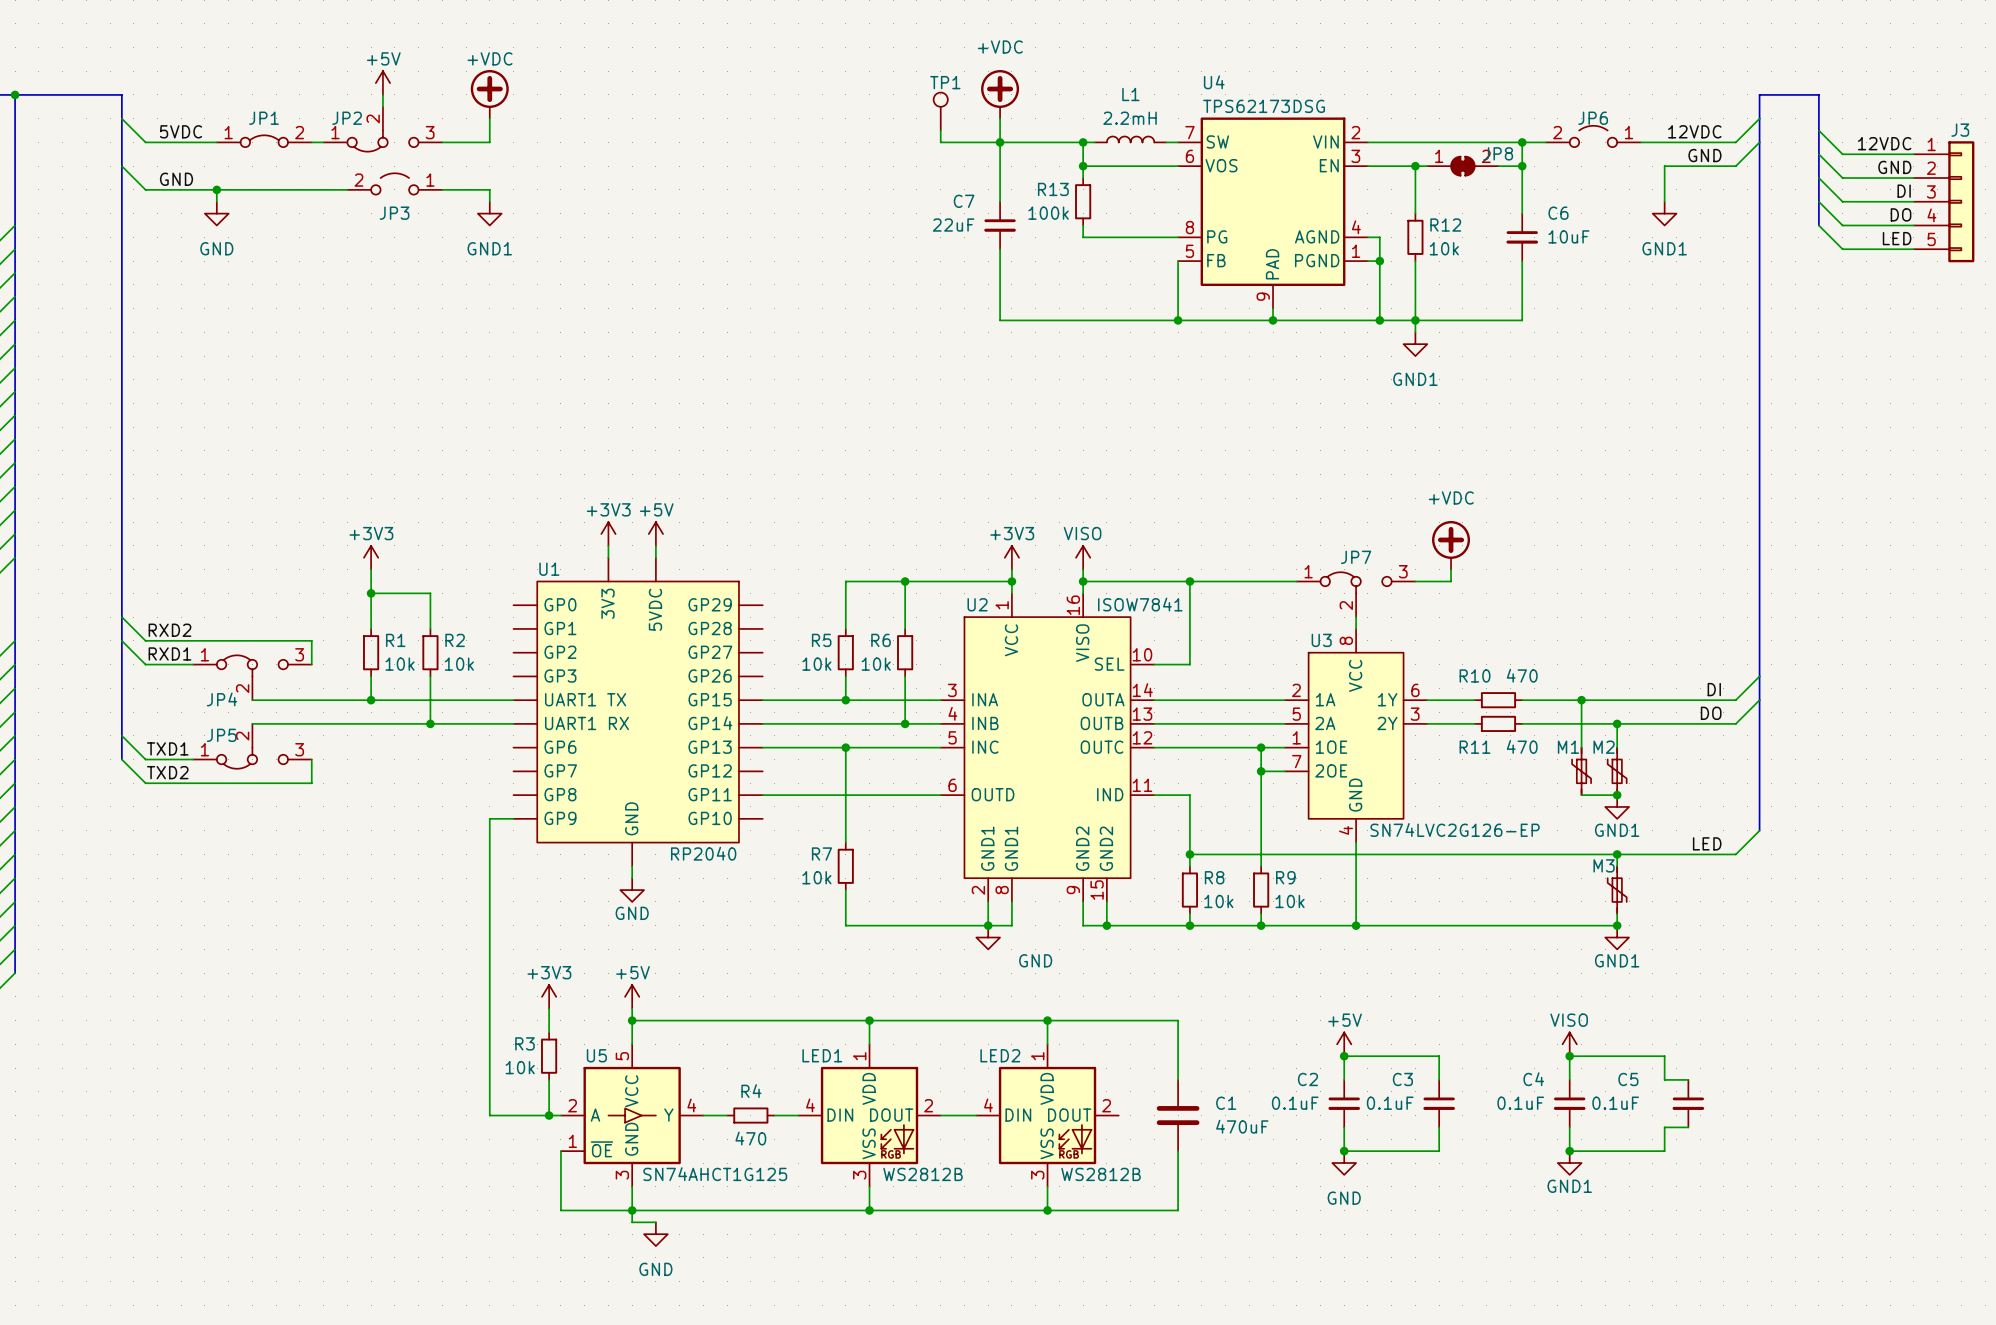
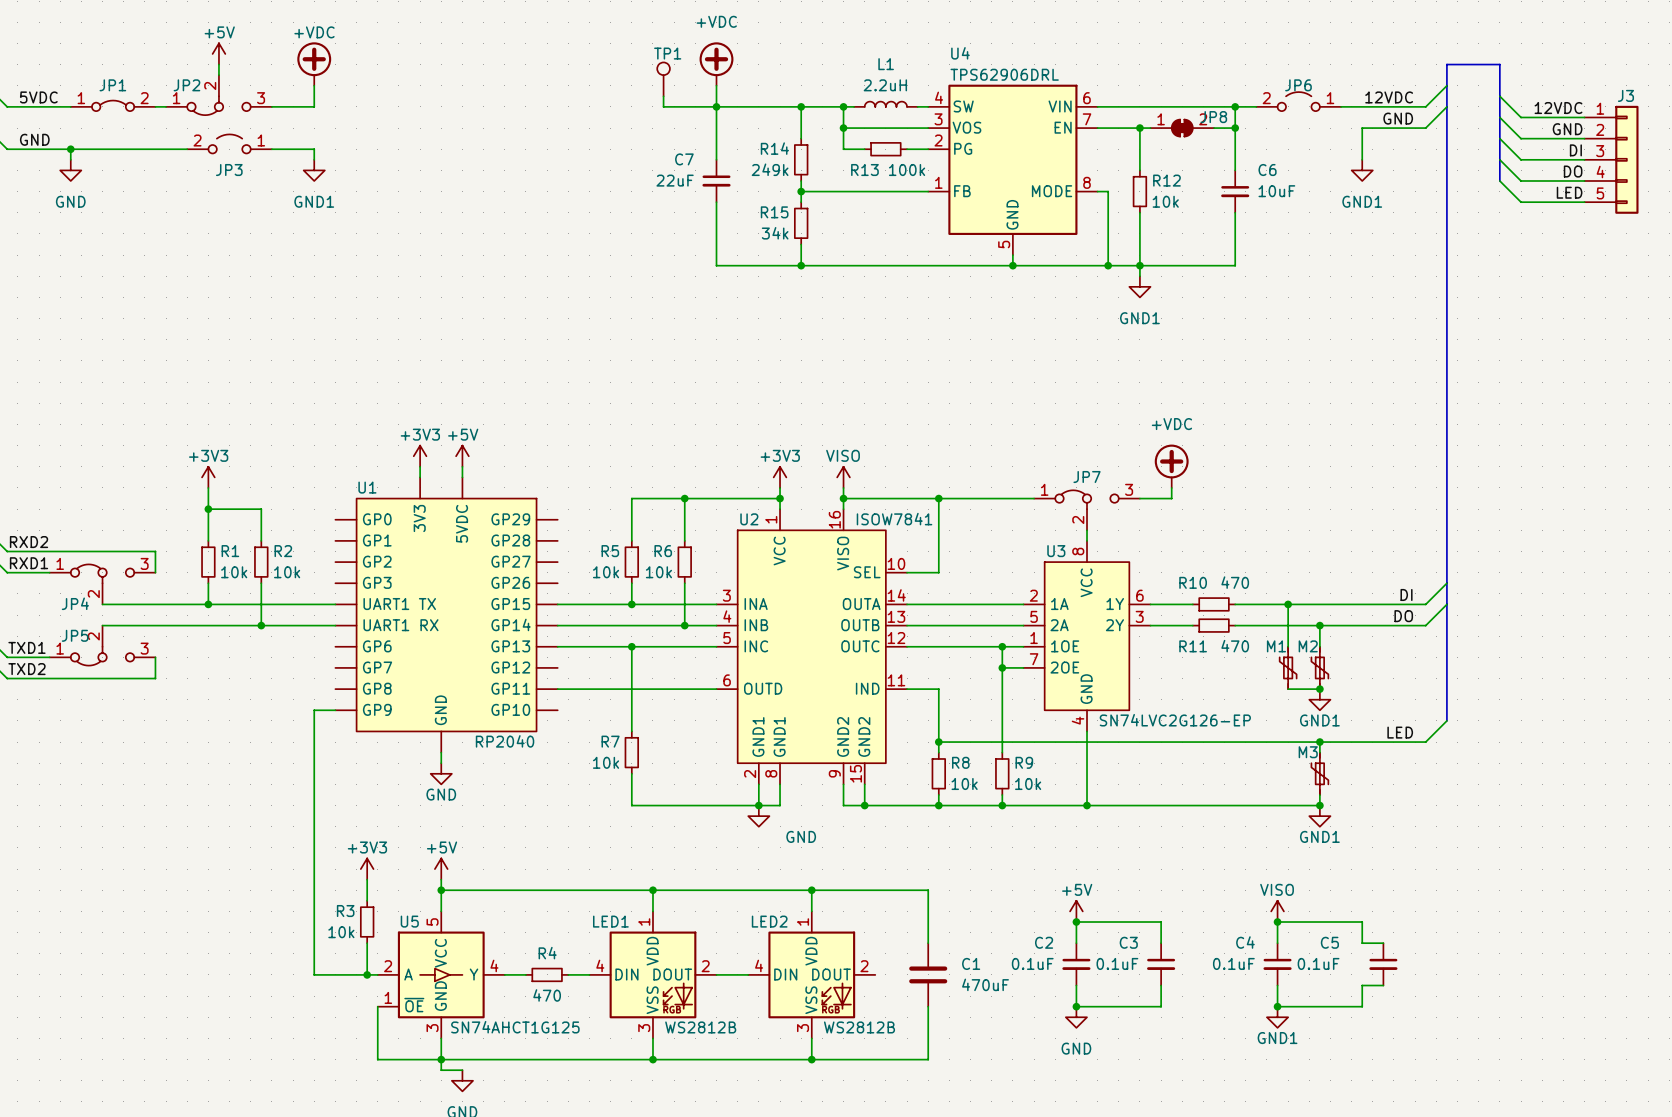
power symbol position: +VDC (1000, 94) -> +VDC (716, 64)
U4 value: TPS62173DSG (1264, 106) -> TPS62906DRL (1004, 74)
TP1 position: (940, 111) -> (663, 79)
U4 symbol: [1178, 117, 1368, 309] -> [928, 84, 1098, 256]
wire: (1000, 118) (1000, 201) -> none
L1 value: 2.2mH (1130, 118) -> 2.2uH (885, 85)
wire: none -> (663, 96) (663, 106) (716, 106) (716, 159)
junction: none -> (716, 106)
junction: (1000, 142) -> none
wire: none -> (801, 106) (801, 138)
junction: none -> (801, 106)
wire: none -> (843, 138) (843, 149) (864, 149)
R13 name position: R13 (1053, 189) -> R13 (864, 170)
wire: none -> (907, 149) (928, 149)
R14: none -> 249k (801, 159)
R13 rotation: 0° (1083, 201) -> 90° clockwise (885, 149)
R13 position: (1083, 201) -> (885, 149)
R13 value position: 100k (1048, 213) -> 100k (907, 170)
C7 position: (1000, 225) -> (716, 180)
wire: none -> (801, 180) (801, 202)
wire: (1083, 225) (1083, 237) -> (801, 191) (843, 191)
junction: none -> (801, 191)
wire: (1000, 249) (1000, 320) -> (716, 202) (716, 265) (769, 265)
wire: (1178, 261) (1178, 320) -> none
wire: (1367, 261) (1379, 261) -> none
junction: (1379, 261) -> none
R15: none -> 34k (801, 223)
wire: none -> (801, 244) (801, 265)
junction: none -> (801, 265)
junction: (1178, 320) -> none

